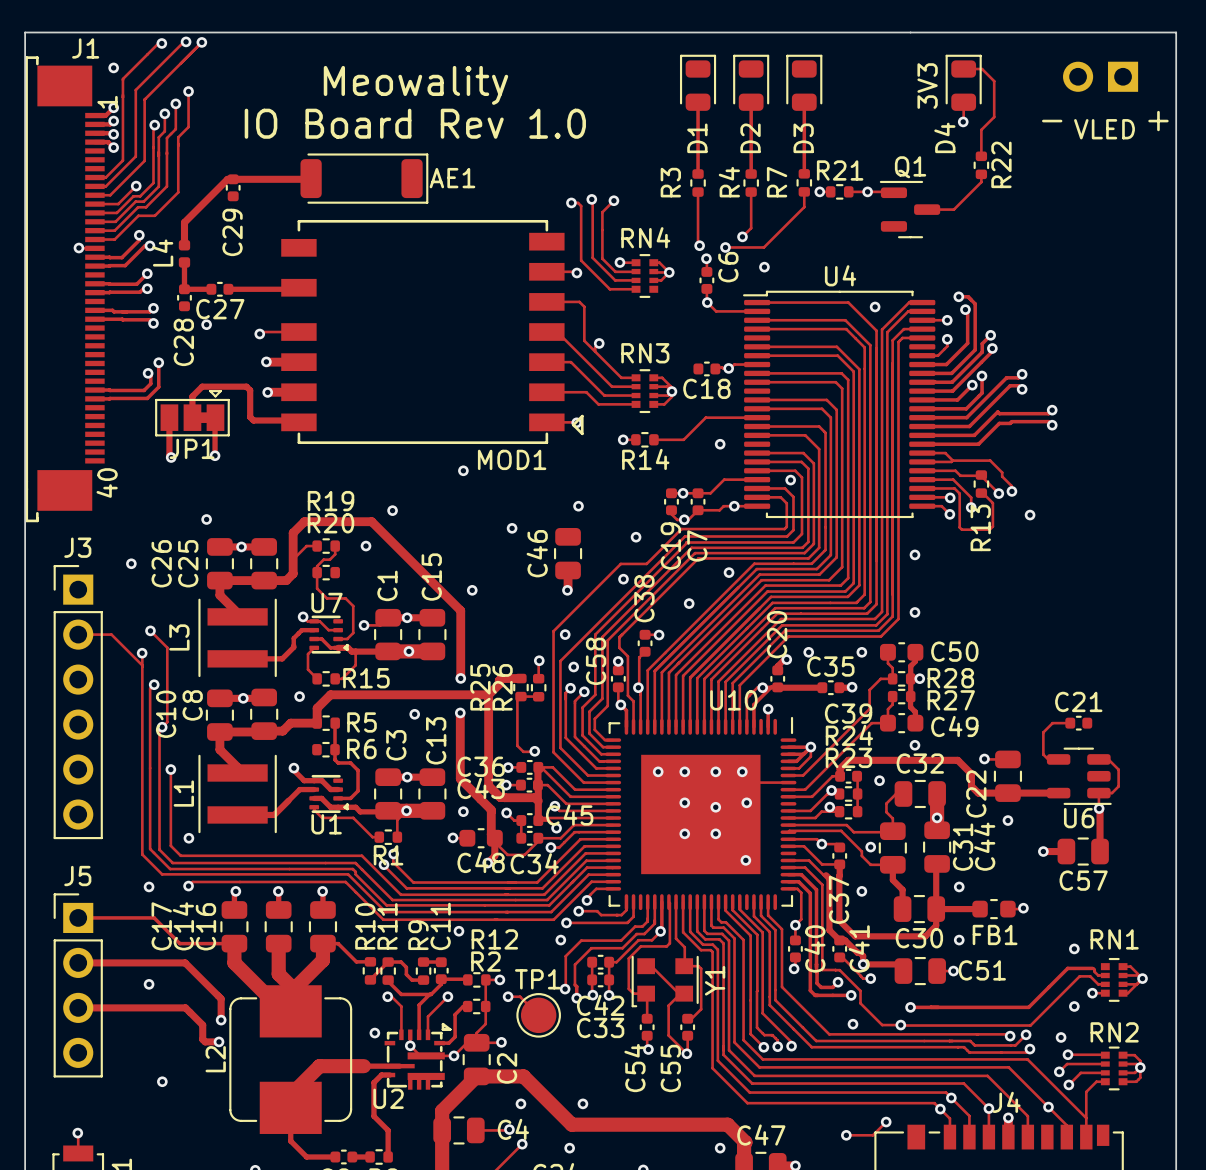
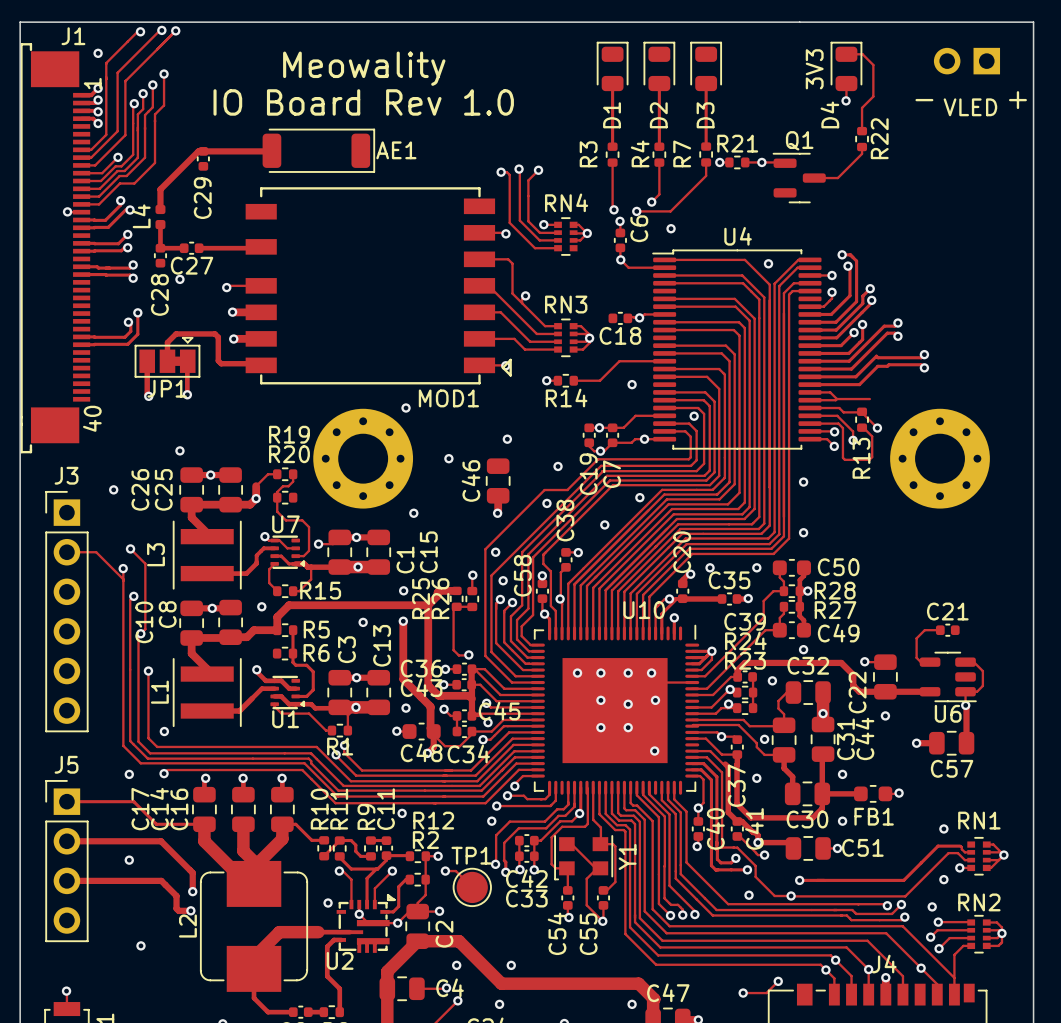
track: (990, 460) (1002, 472) (1002, 476) (1011, 485) (1011, 491) -> none
via: (1011, 491) -> none
via: (392, 510) -> none
via: (1030, 515) -> none
part: none -> (363, 458)
part: none -> (940, 458)
via: (366, 546) -> none
track: (293, 559) (293, 532) (304, 521) (371, 521) (460, 610) (460, 678) -> none
via: none -> (256, 498)
C15 name position: C15 (431, 577) -> C15 (428, 552)
C1 name position: C1 (387, 585) -> C1 (405, 560)

